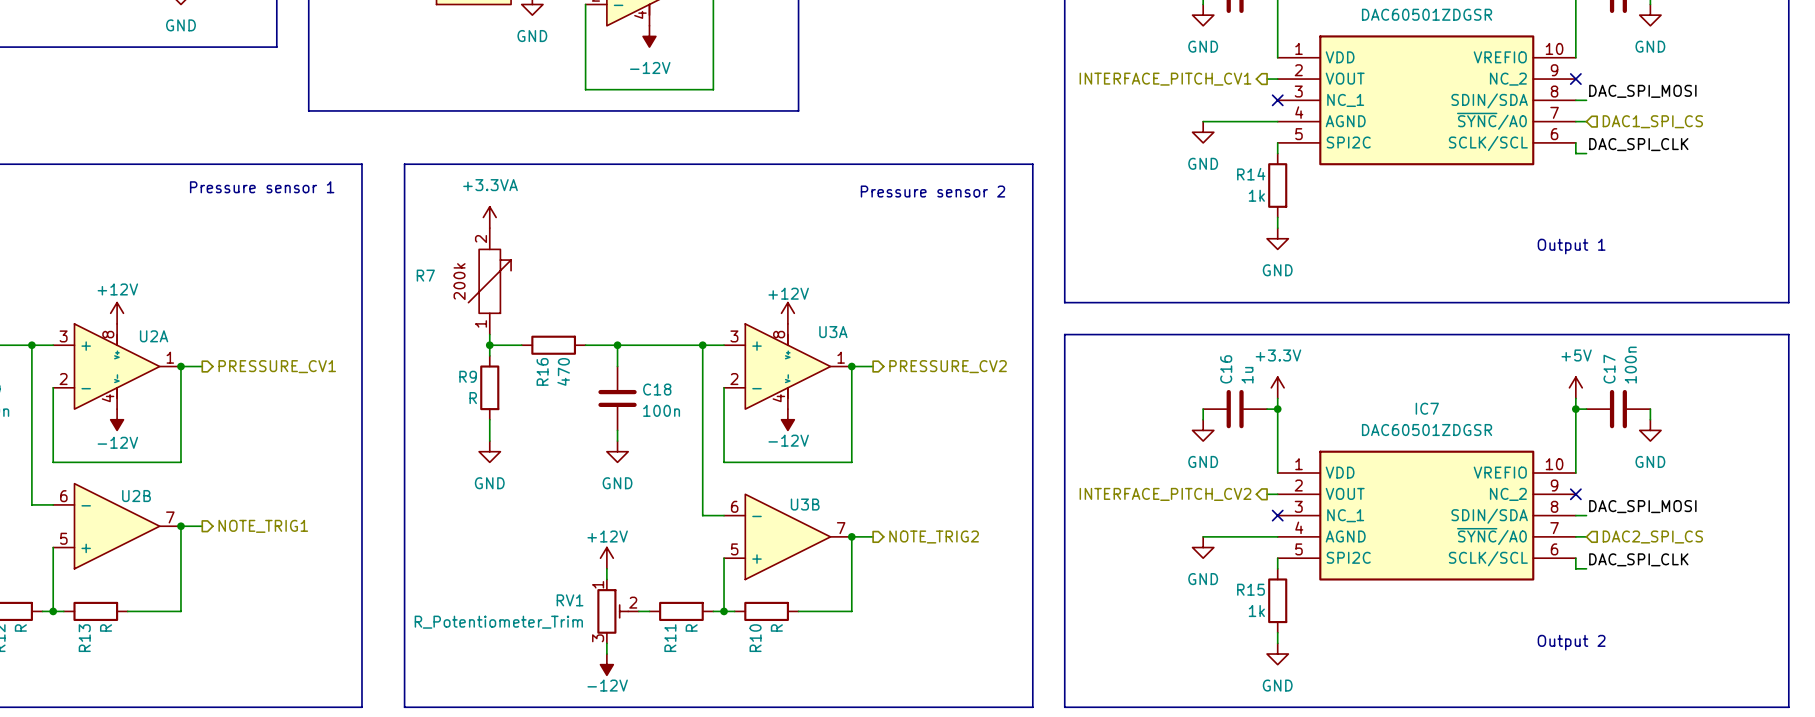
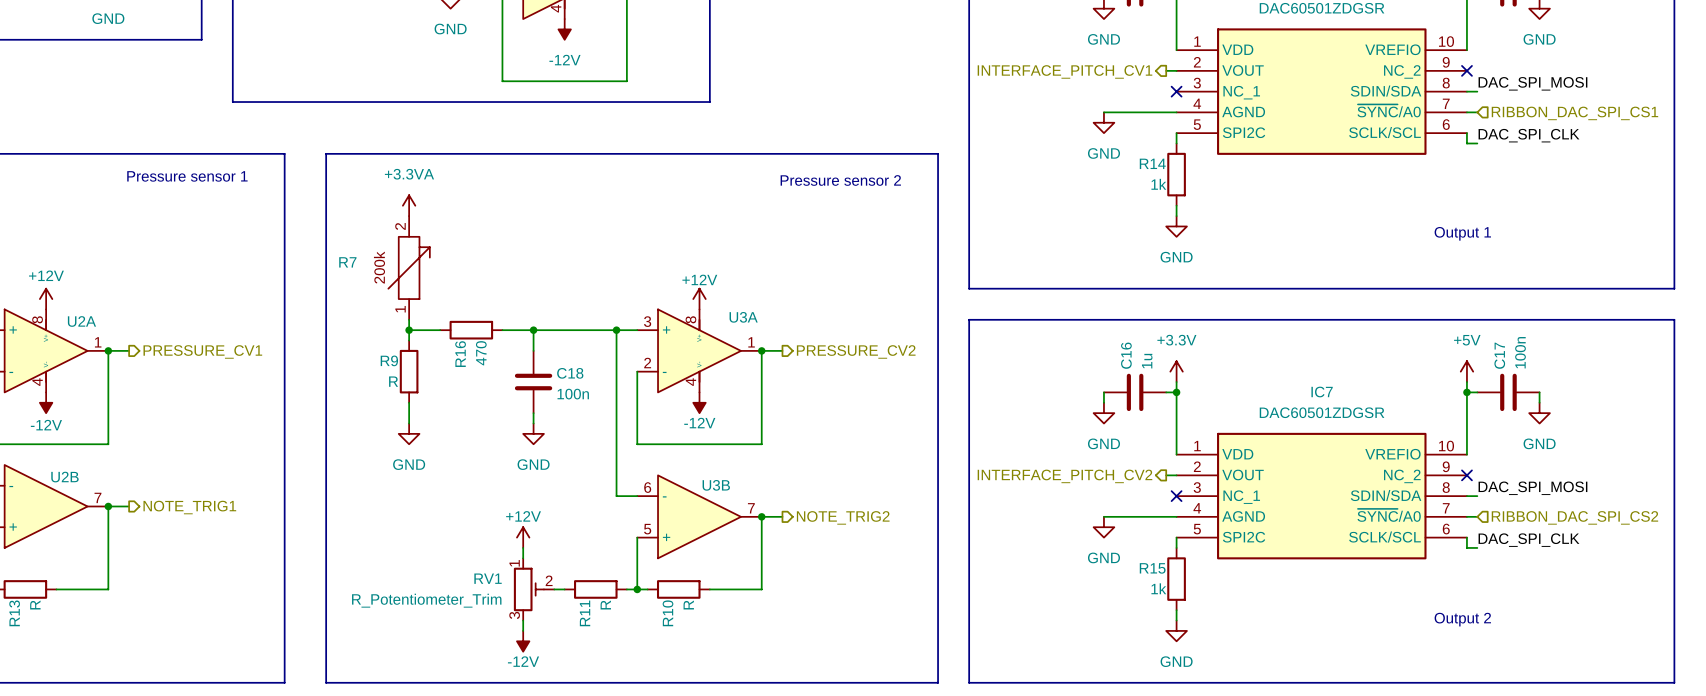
hierarchical label: DAC1_SPI_CS (1652, 121) -> RIBBON_DAC_SPI_CS1 (1574, 113)
hierarchical label: DAC2_SPI_CS (1652, 537) -> RIBBON_DAC_SPI_CS2 (1574, 517)

